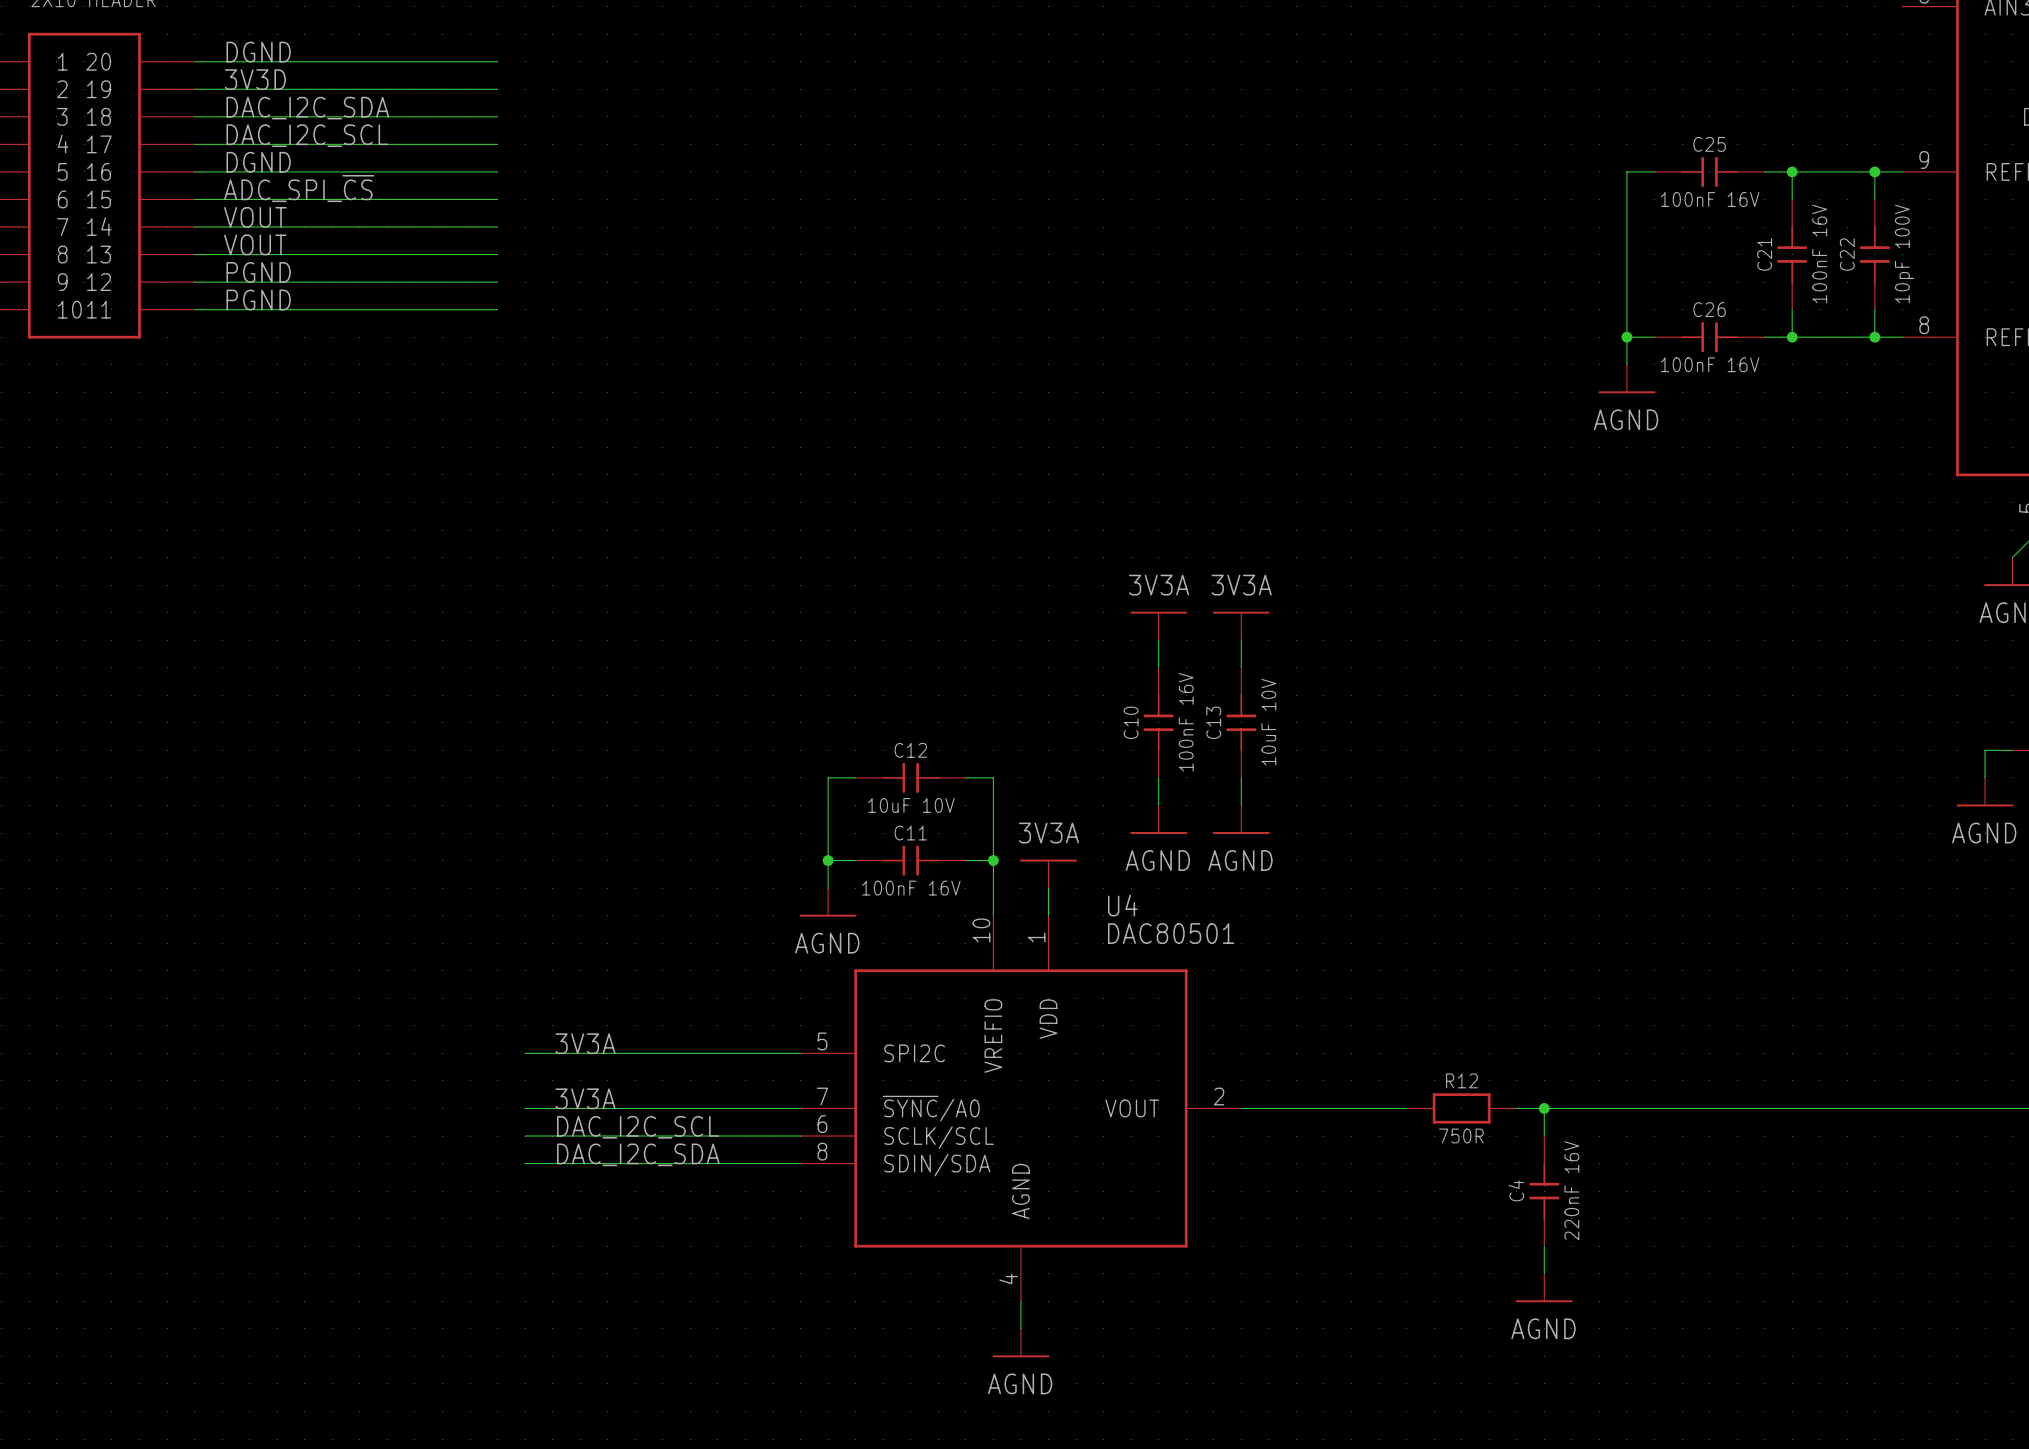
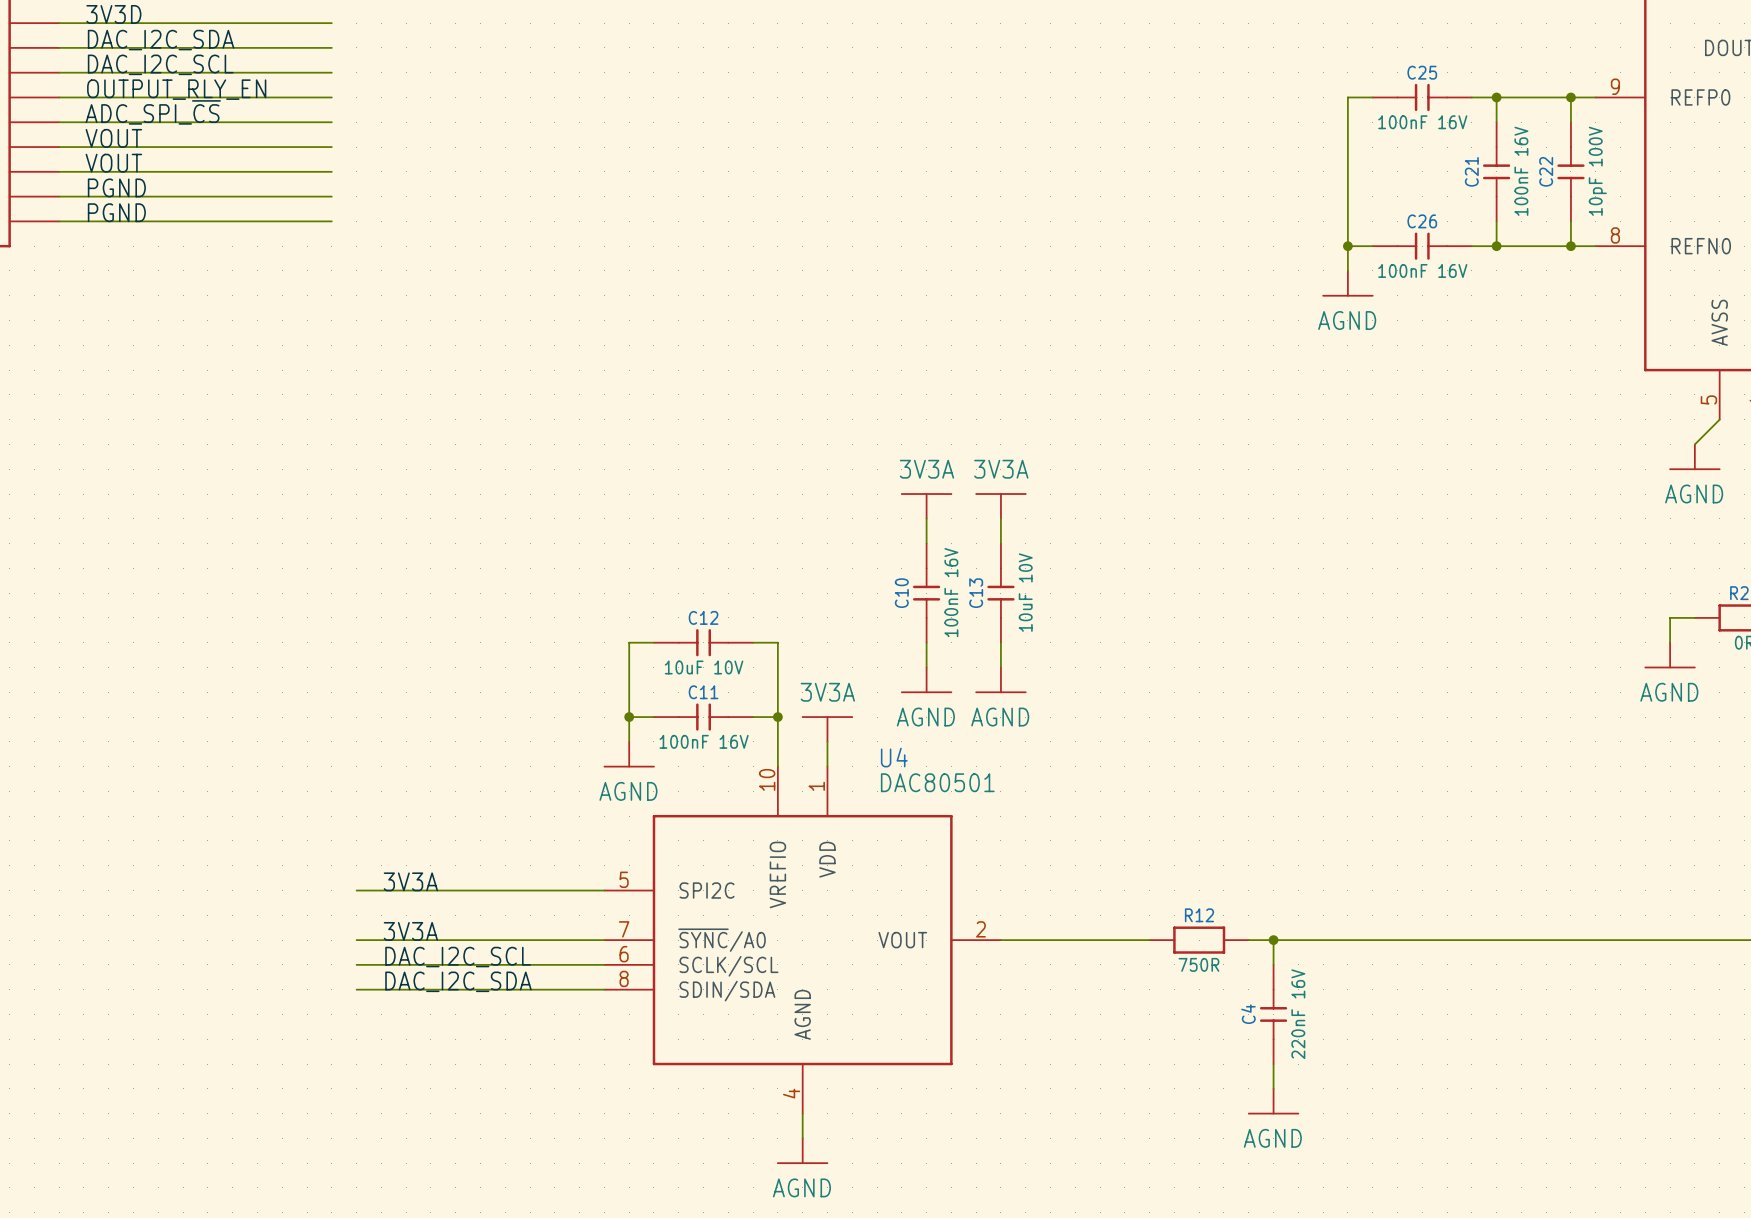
label: DGND (258, 162) -> OUTPUT_RLY_EN (176, 89)

